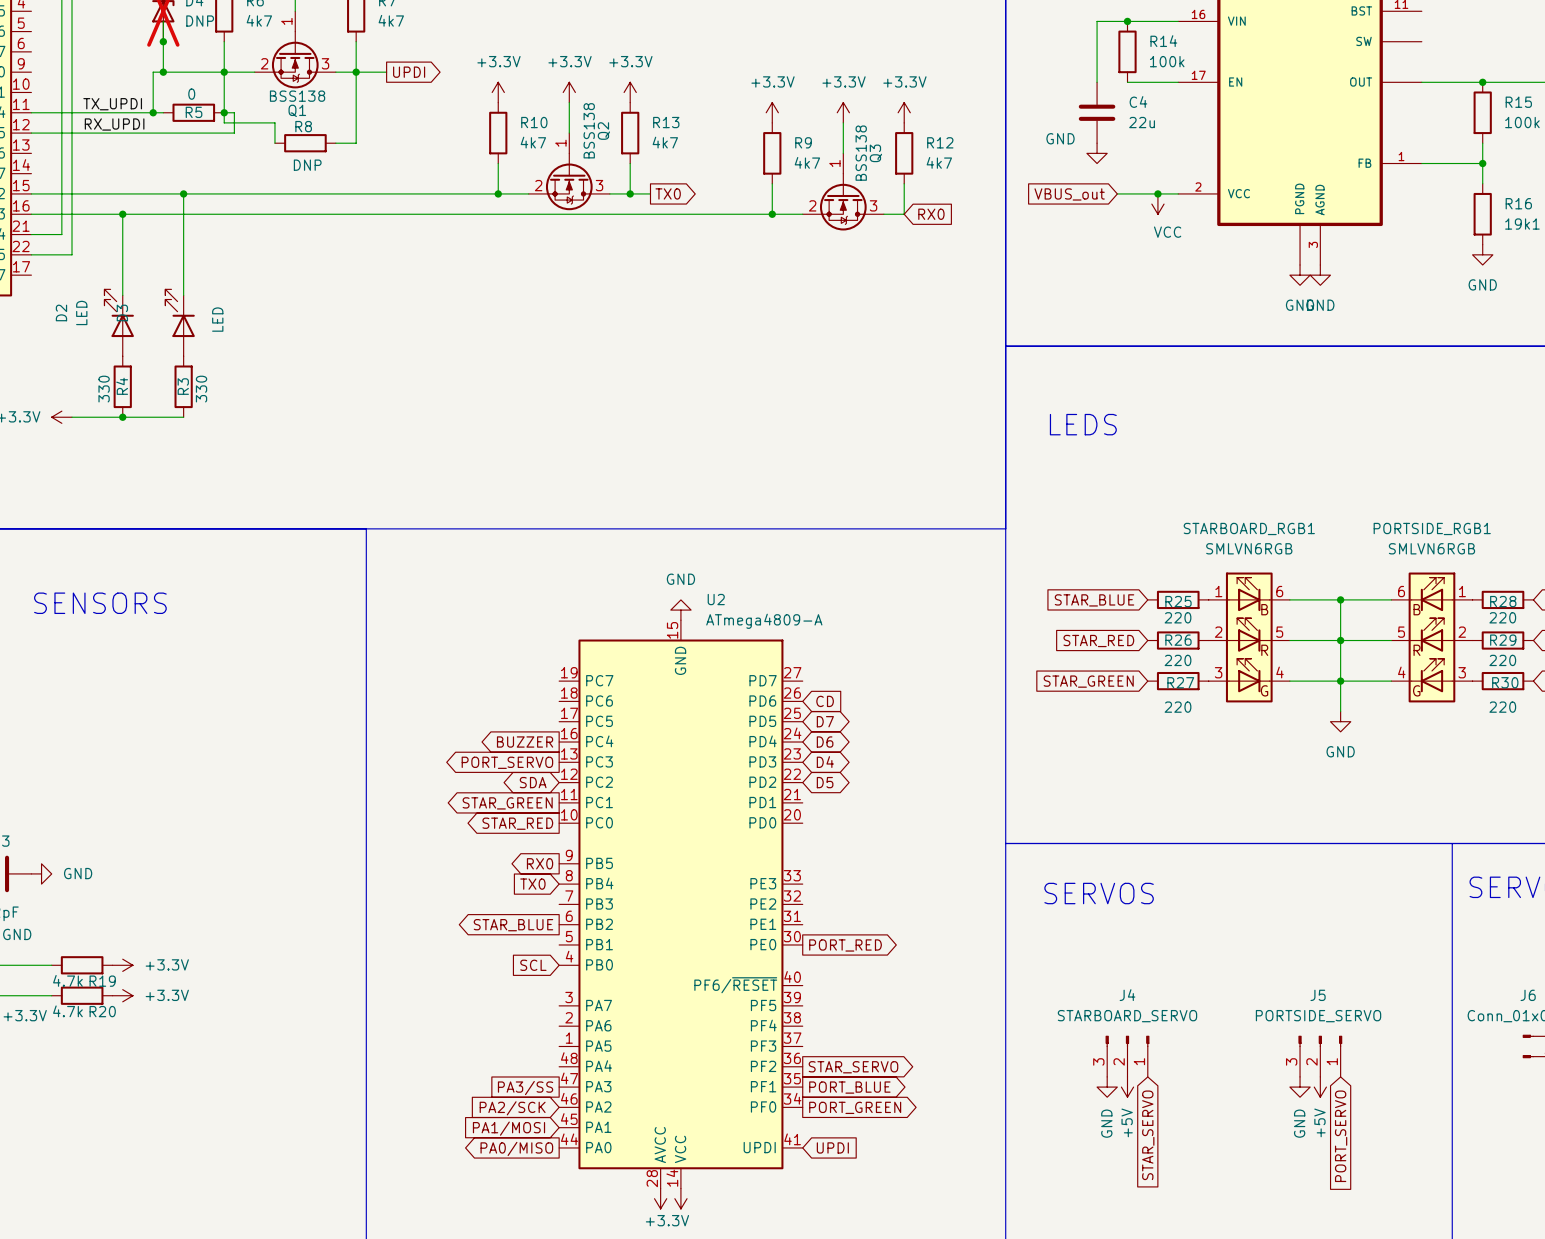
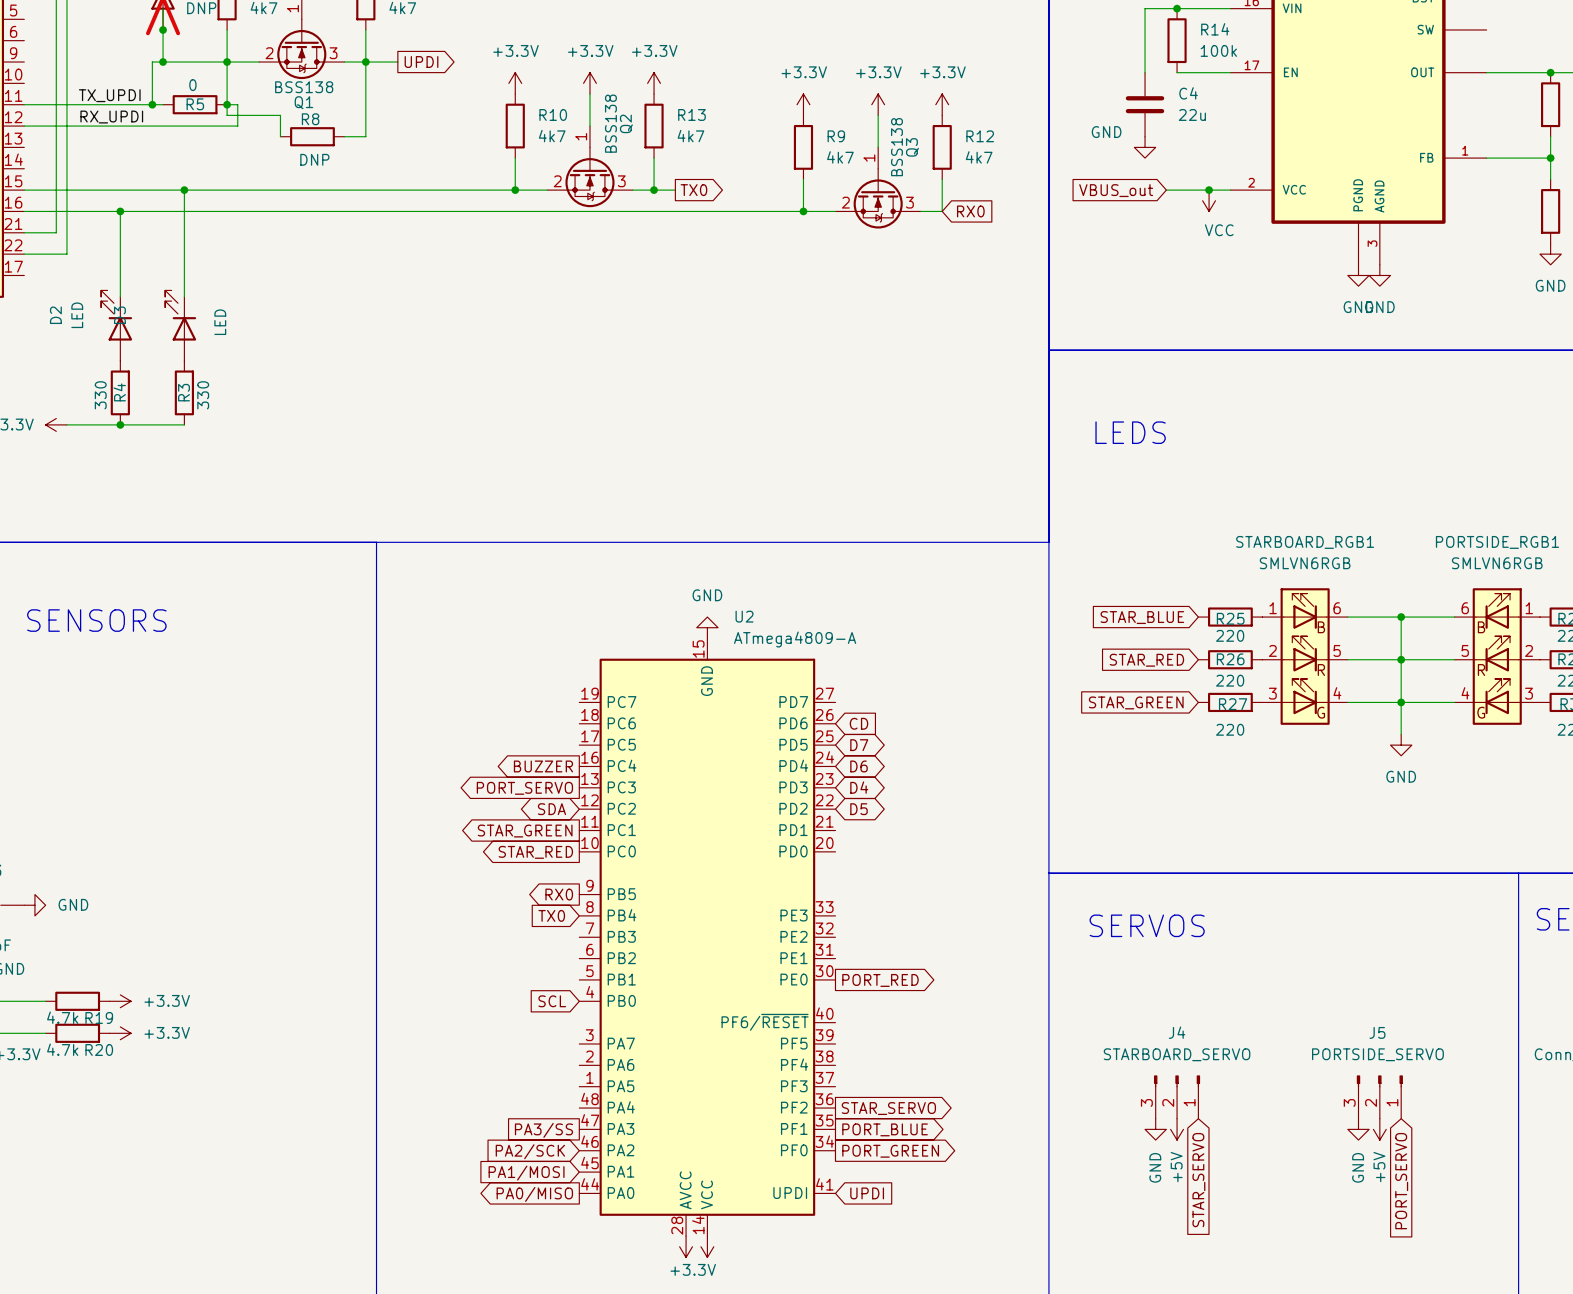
global label: STAR_BLUE (513, 925) -> none

